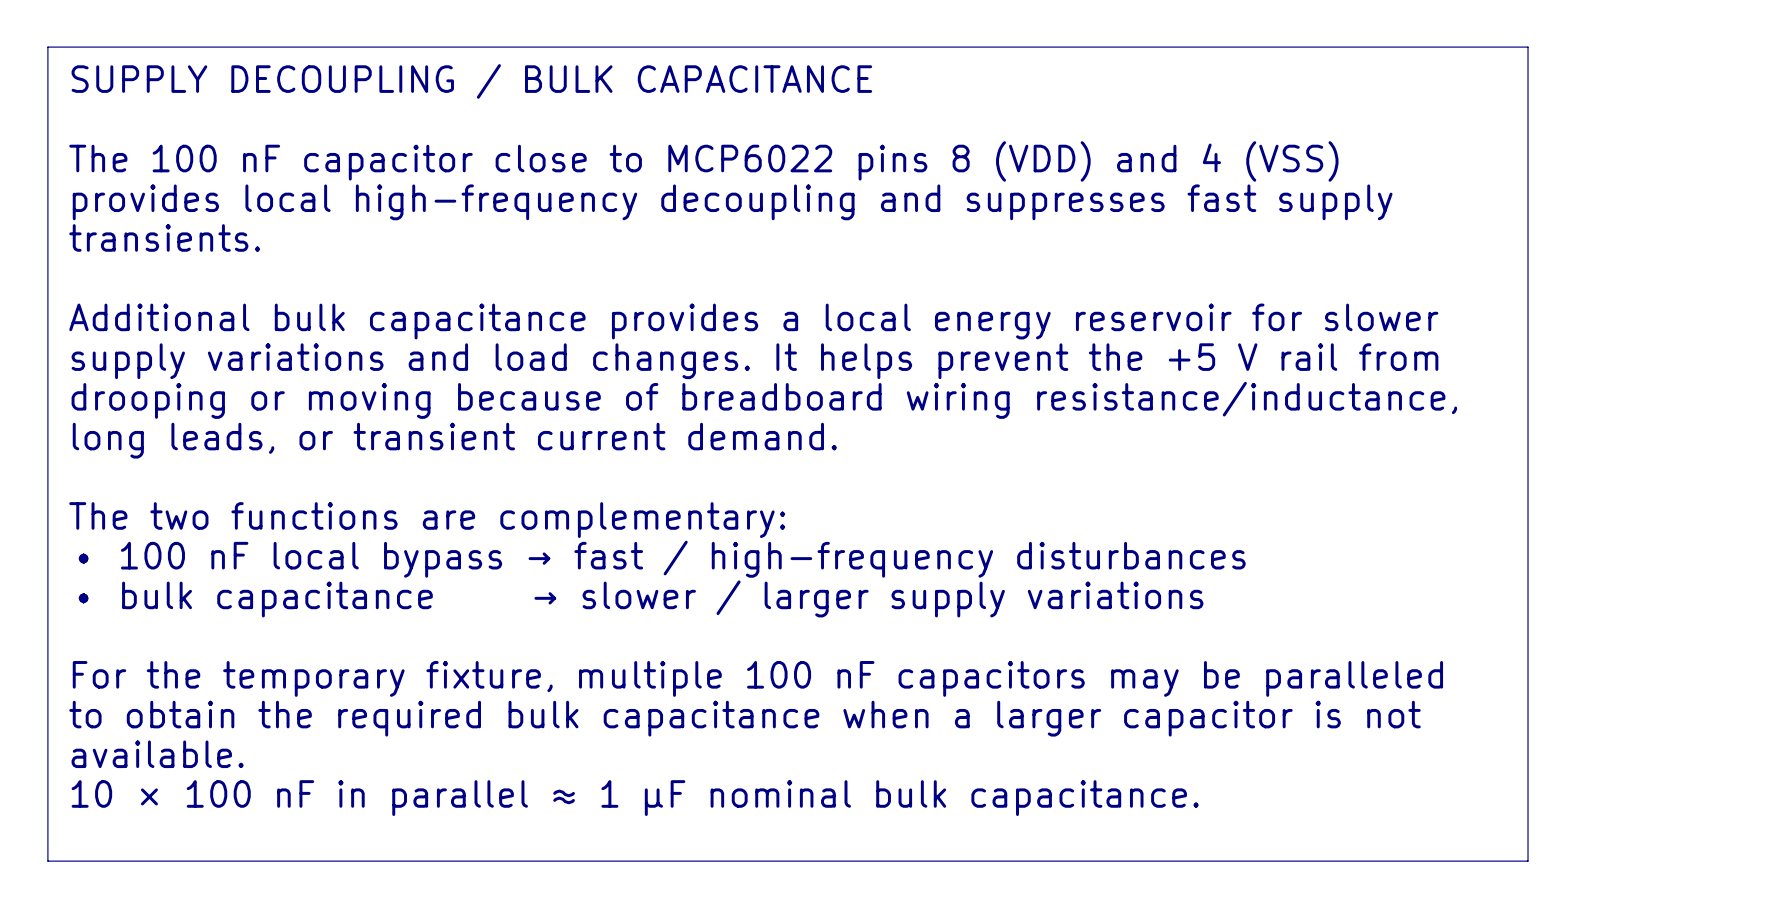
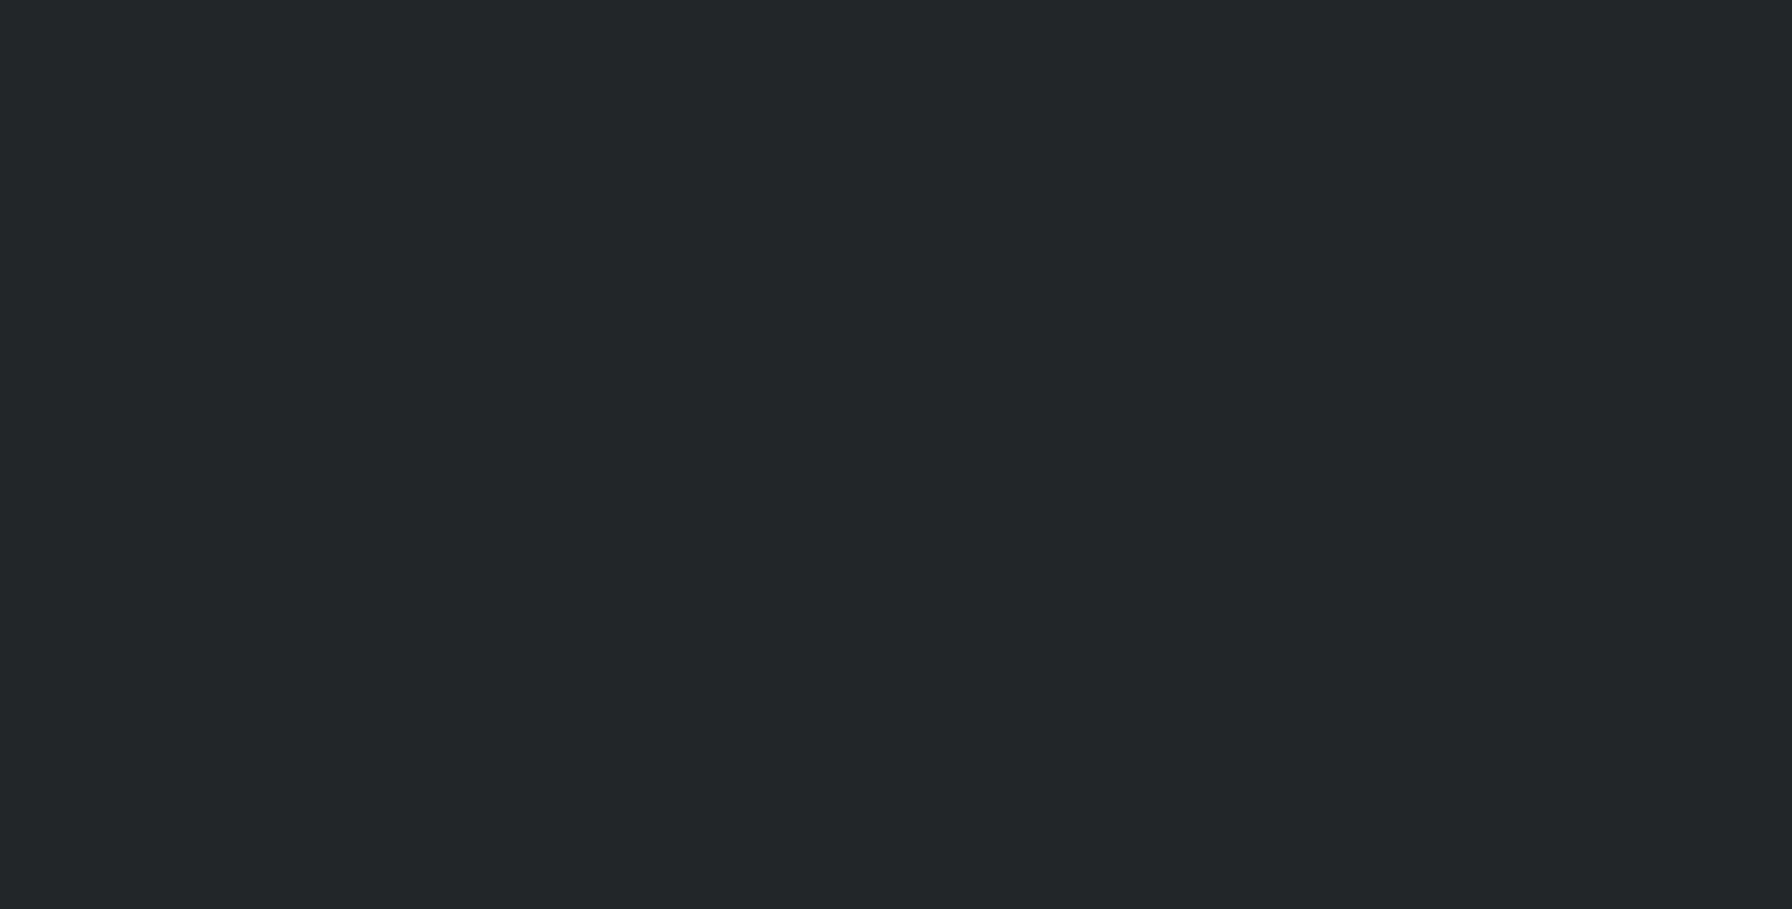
line: (47, 47) (1528, 47) (1528, 861) (47, 861) (47, 47) -> none
text: SUPPLY DECOUPLING / BULK CAPACITANCE (471, 81) -> none
text: The 100 nF capacitor close to MCP6022 pins 8 (VDD) and 4 (VSS) (703, 161) -> none
text: provides local high-frequency decoupling and suppresses fast supply (732, 202) -> none
text: transients. (164, 237) -> none
text: Additional bulk capacitance provides a local energy reservoir for slower (753, 321) -> none
text: supply variations and load changes. It helps prevent the +5 V rail from (754, 361) -> none
text: drooping or moving because of breadboard wiring resistance/inductance, (764, 400) -> none
text: long leads, or transient current demand. (454, 440) -> none
text: The two functions are complementary: (427, 520) -> none
text: • 100 nF local bypass → fast / high-frequency disturbances (662, 559) -> none
text: • bulk capacitance → slower / larger supply variations (641, 598) -> none
text: For the temporary fixture, multiple 100 nF capacitors may be paralleled (757, 678) -> none
text: to obtain the required bulk capacitance when a larger capacitor is not (744, 718) -> none
text: available. (157, 754) -> none
text: 10 × 100 nF in parallel ≈ 1 µF nominal bulk capacitance. (635, 798) -> none

